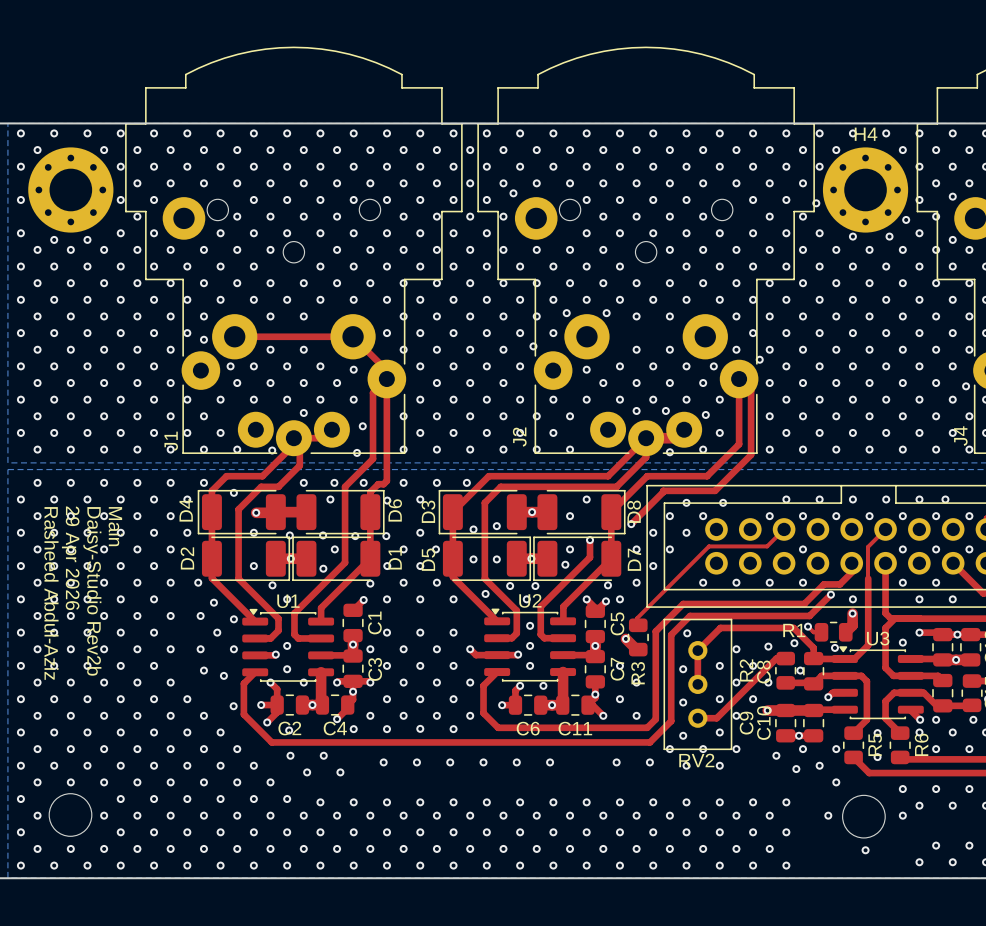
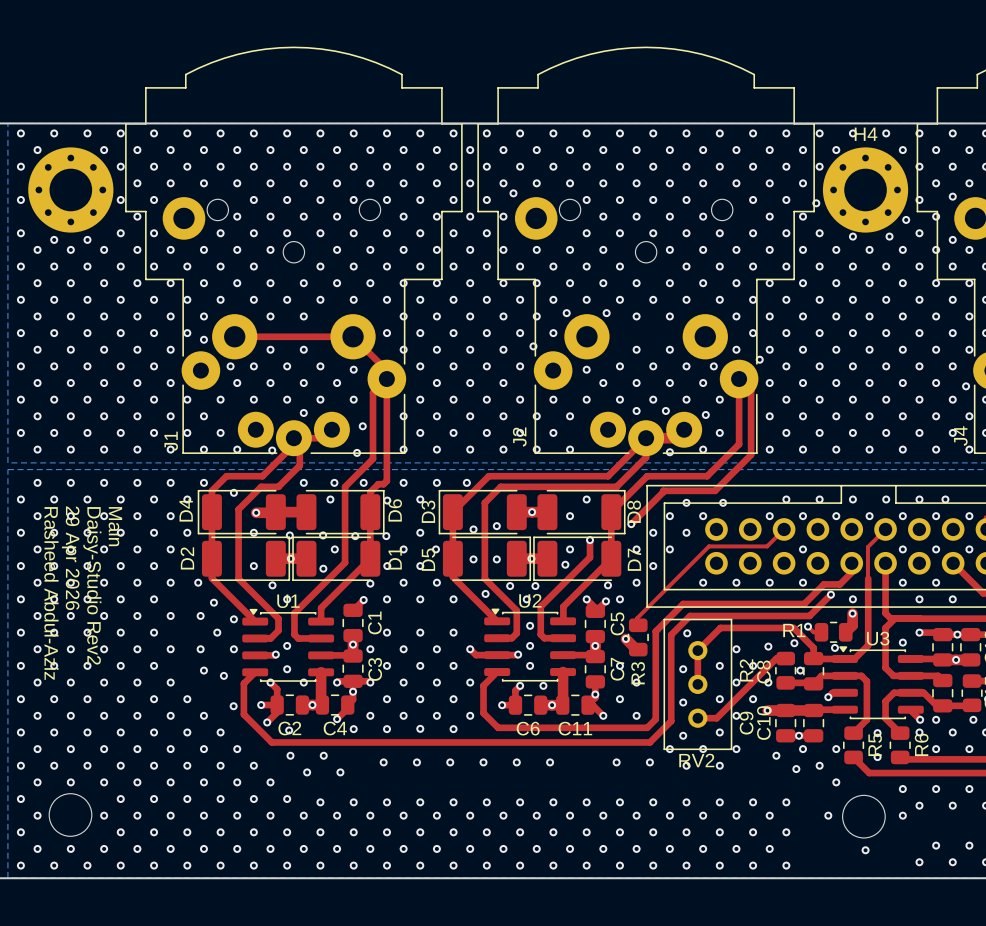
text: Daisy-Studio Rev2b (92, 591) -> Daisy-Studio Rev2 (92, 585)

